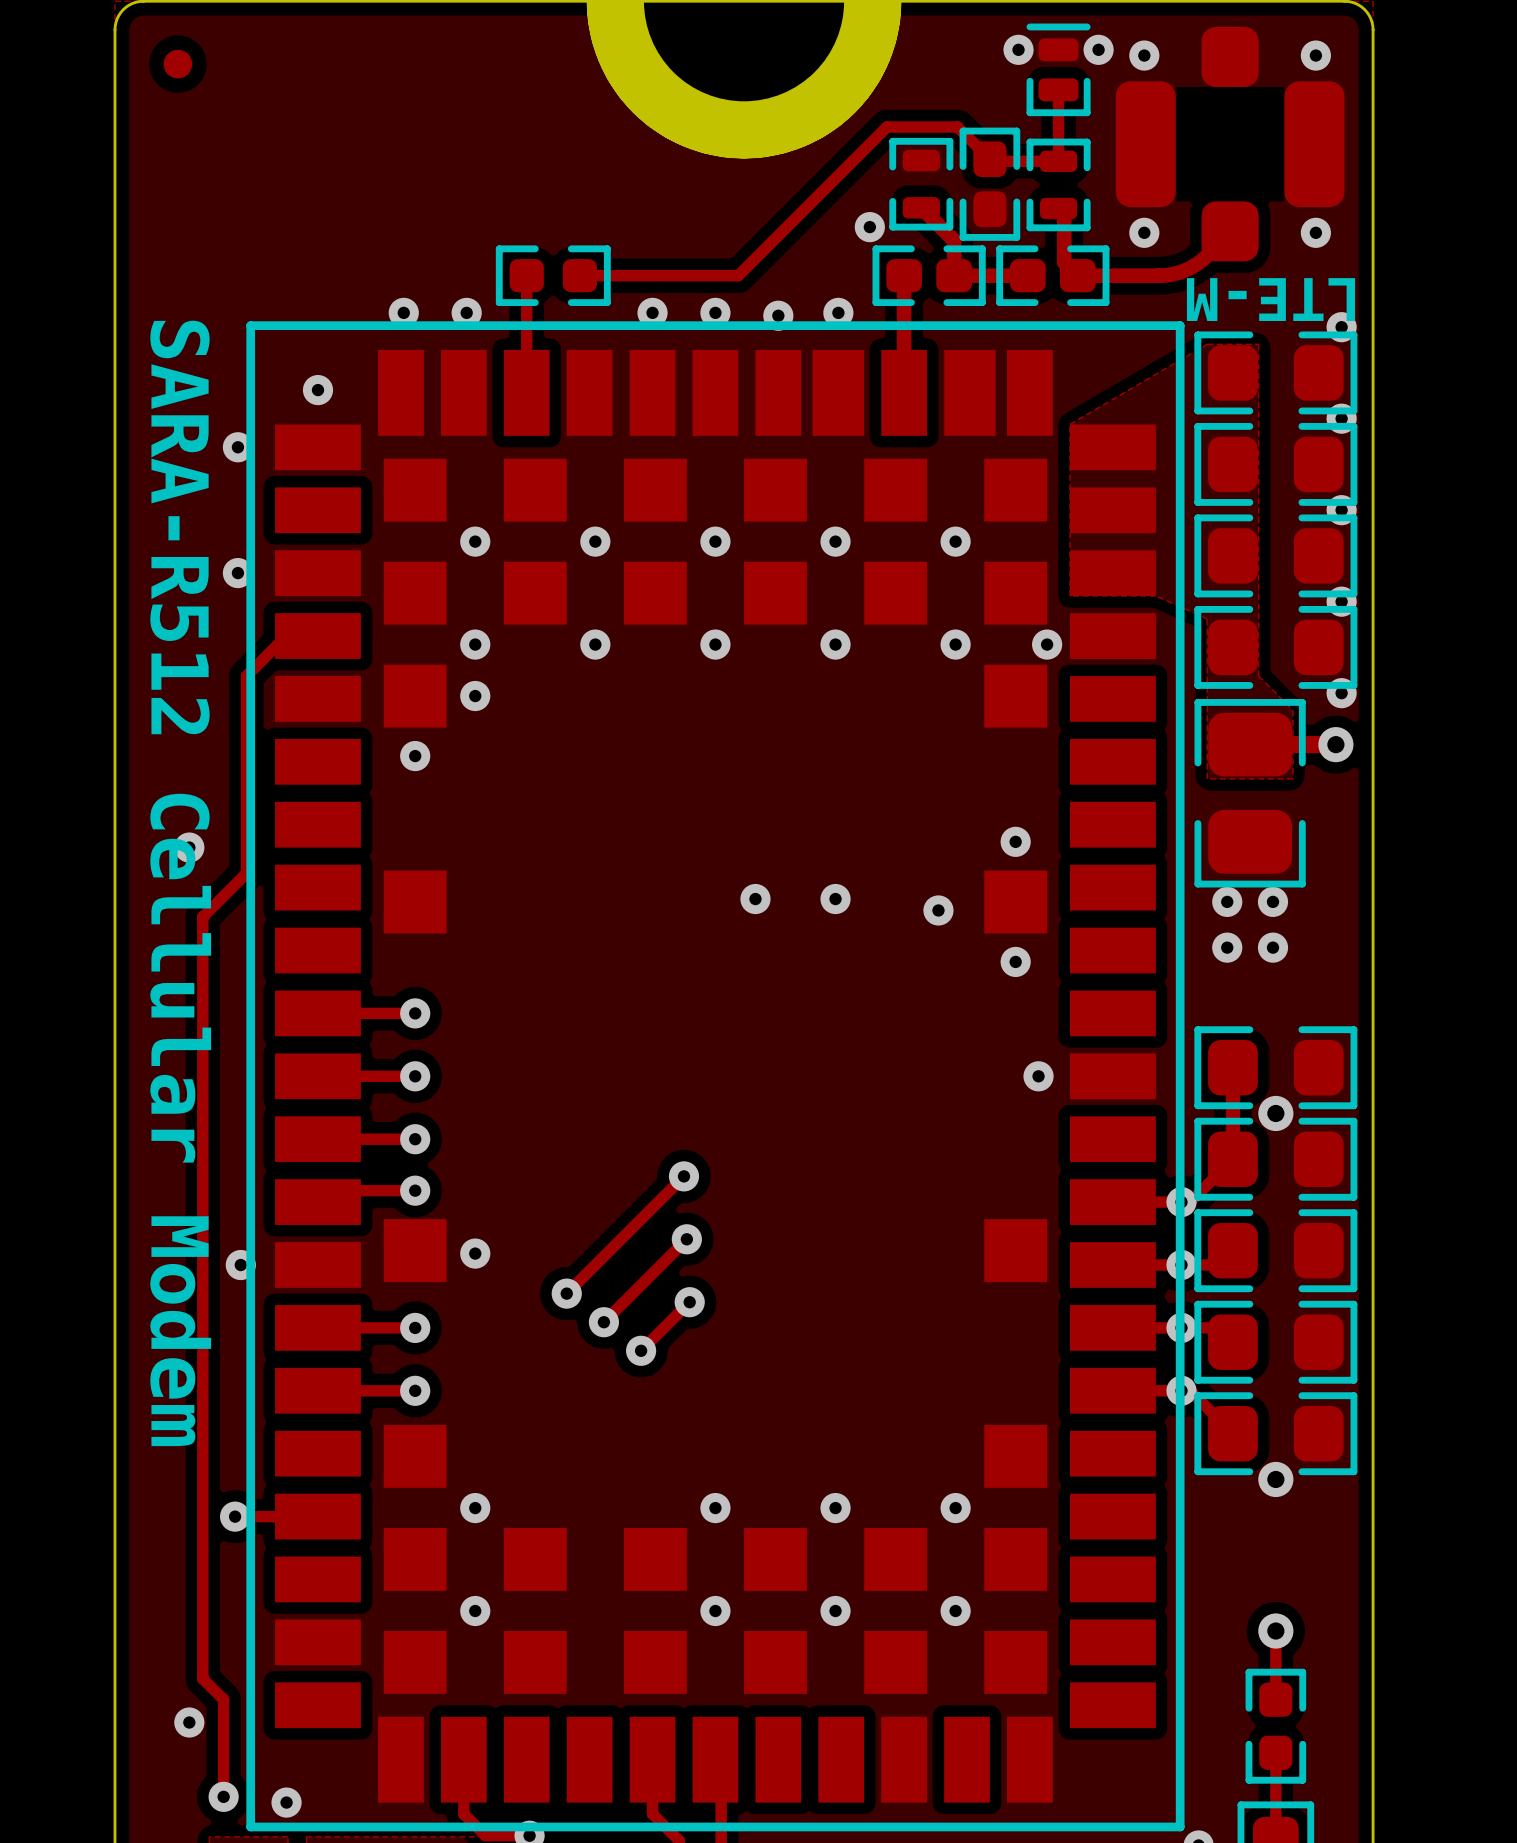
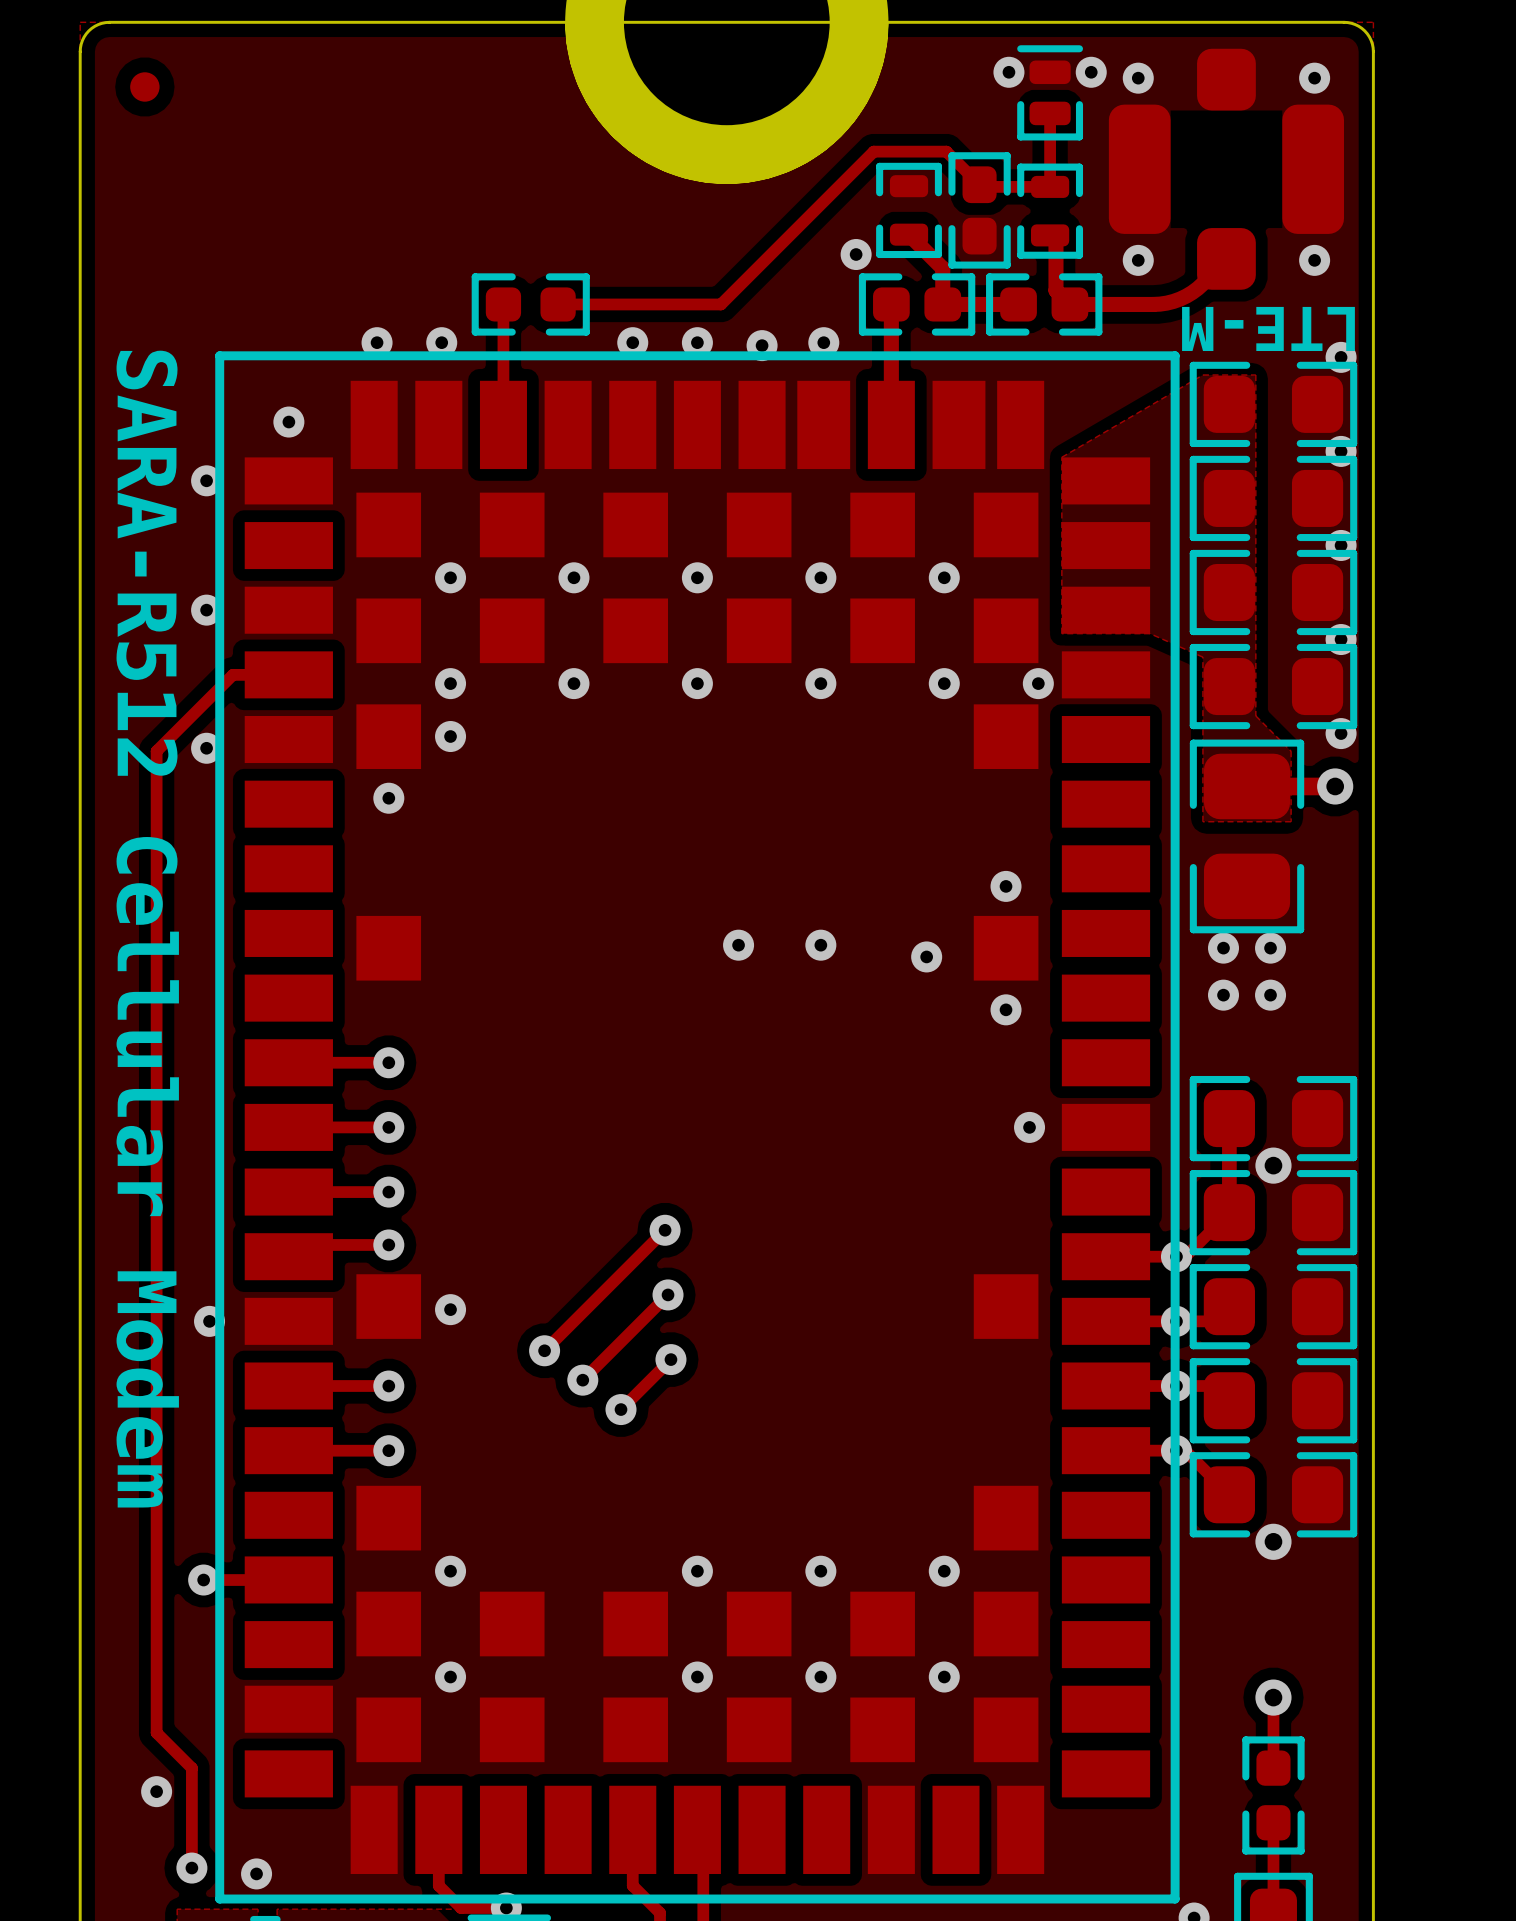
track: (286, 636) (246, 676) (246, 873) (202, 916) (202, 1678) -> (256, 674) (232, 674) (156, 751) (156, 1732) (170, 1746)
via position: (189, 847) -> (206, 748)

